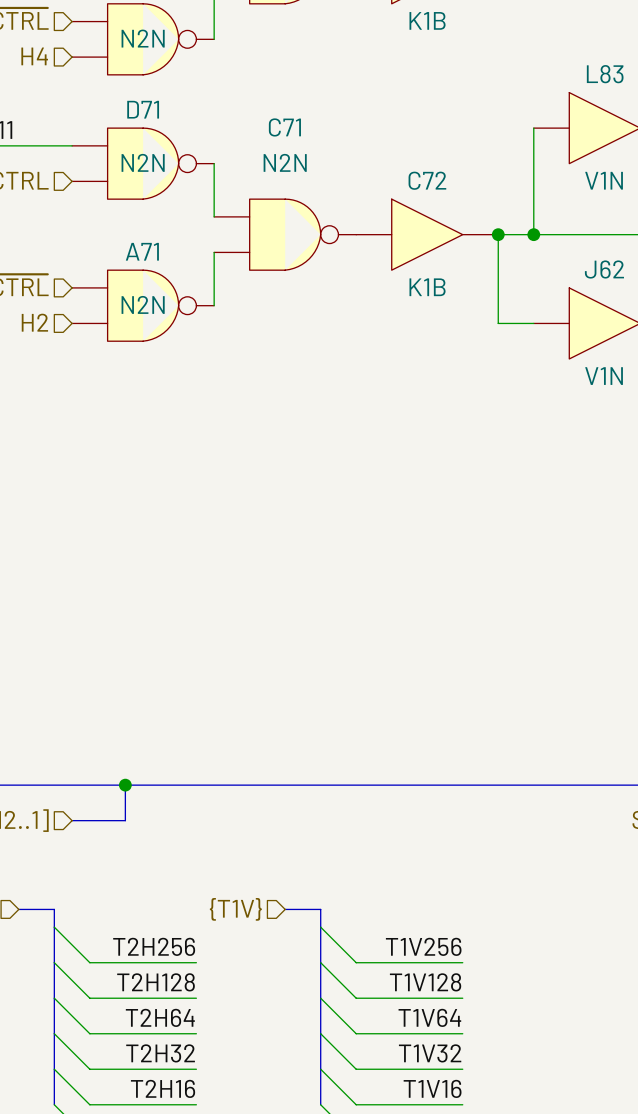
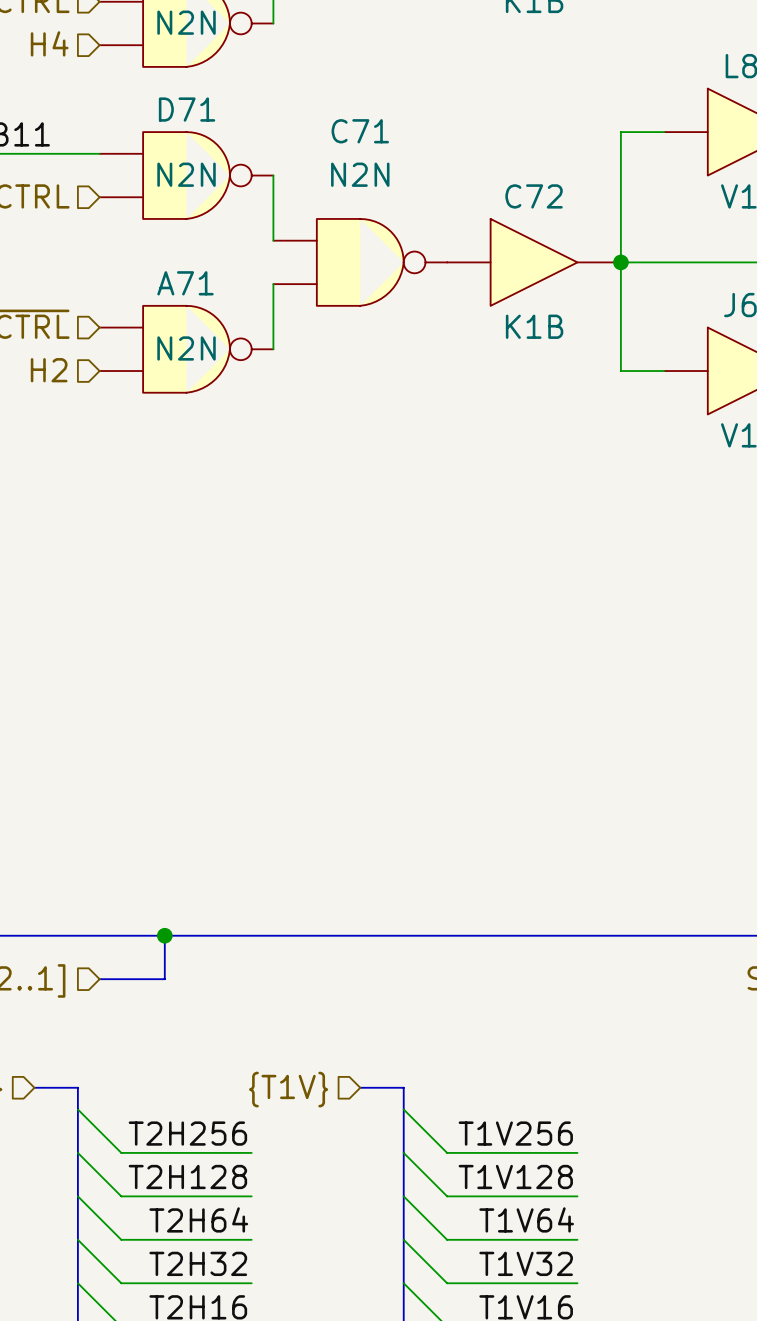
wire: (533, 128) (533, 234) -> (664, 132) (620, 132) (620, 262)
junction: (533, 234) -> none

